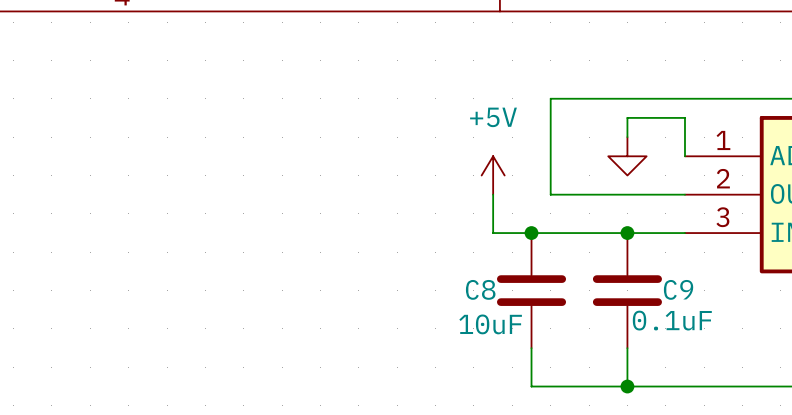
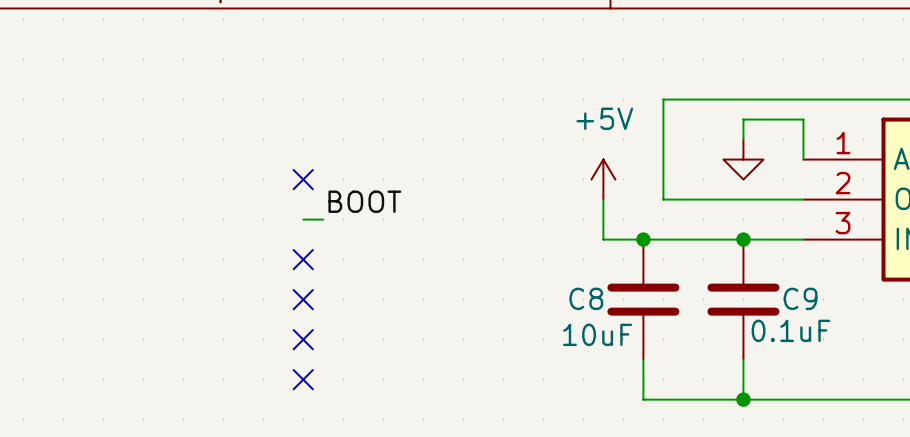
no-connect mark: none -> (303, 179)
label: none -> BOOT (364, 201)
wire: none -> (303, 219) (323, 219)
no-connect mark: none -> (303, 259)
no-connect mark: none -> (303, 299)
no-connect mark: none -> (303, 339)
no-connect mark: none -> (303, 379)

